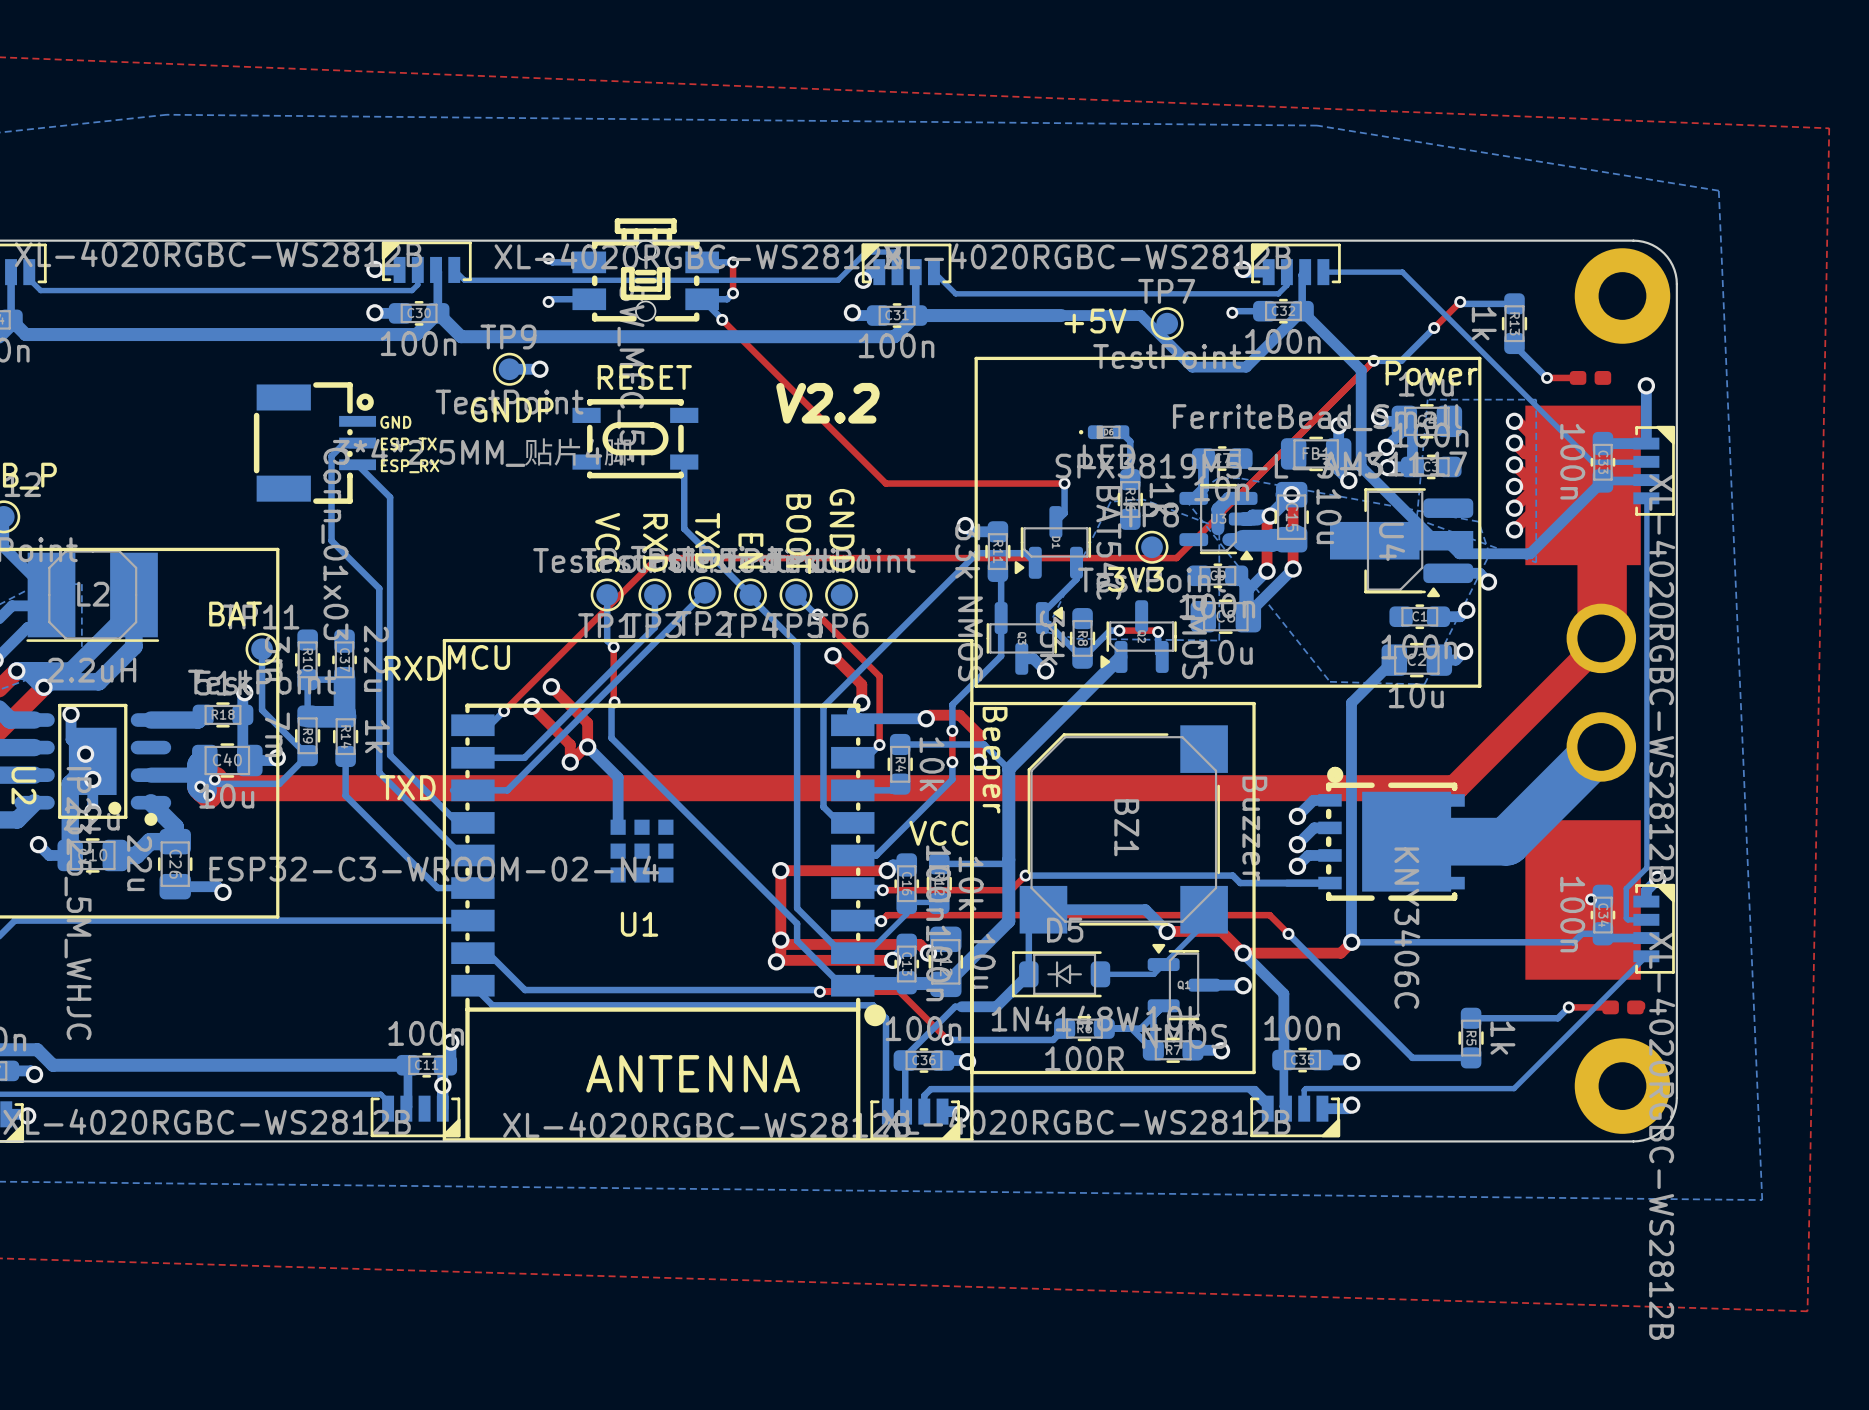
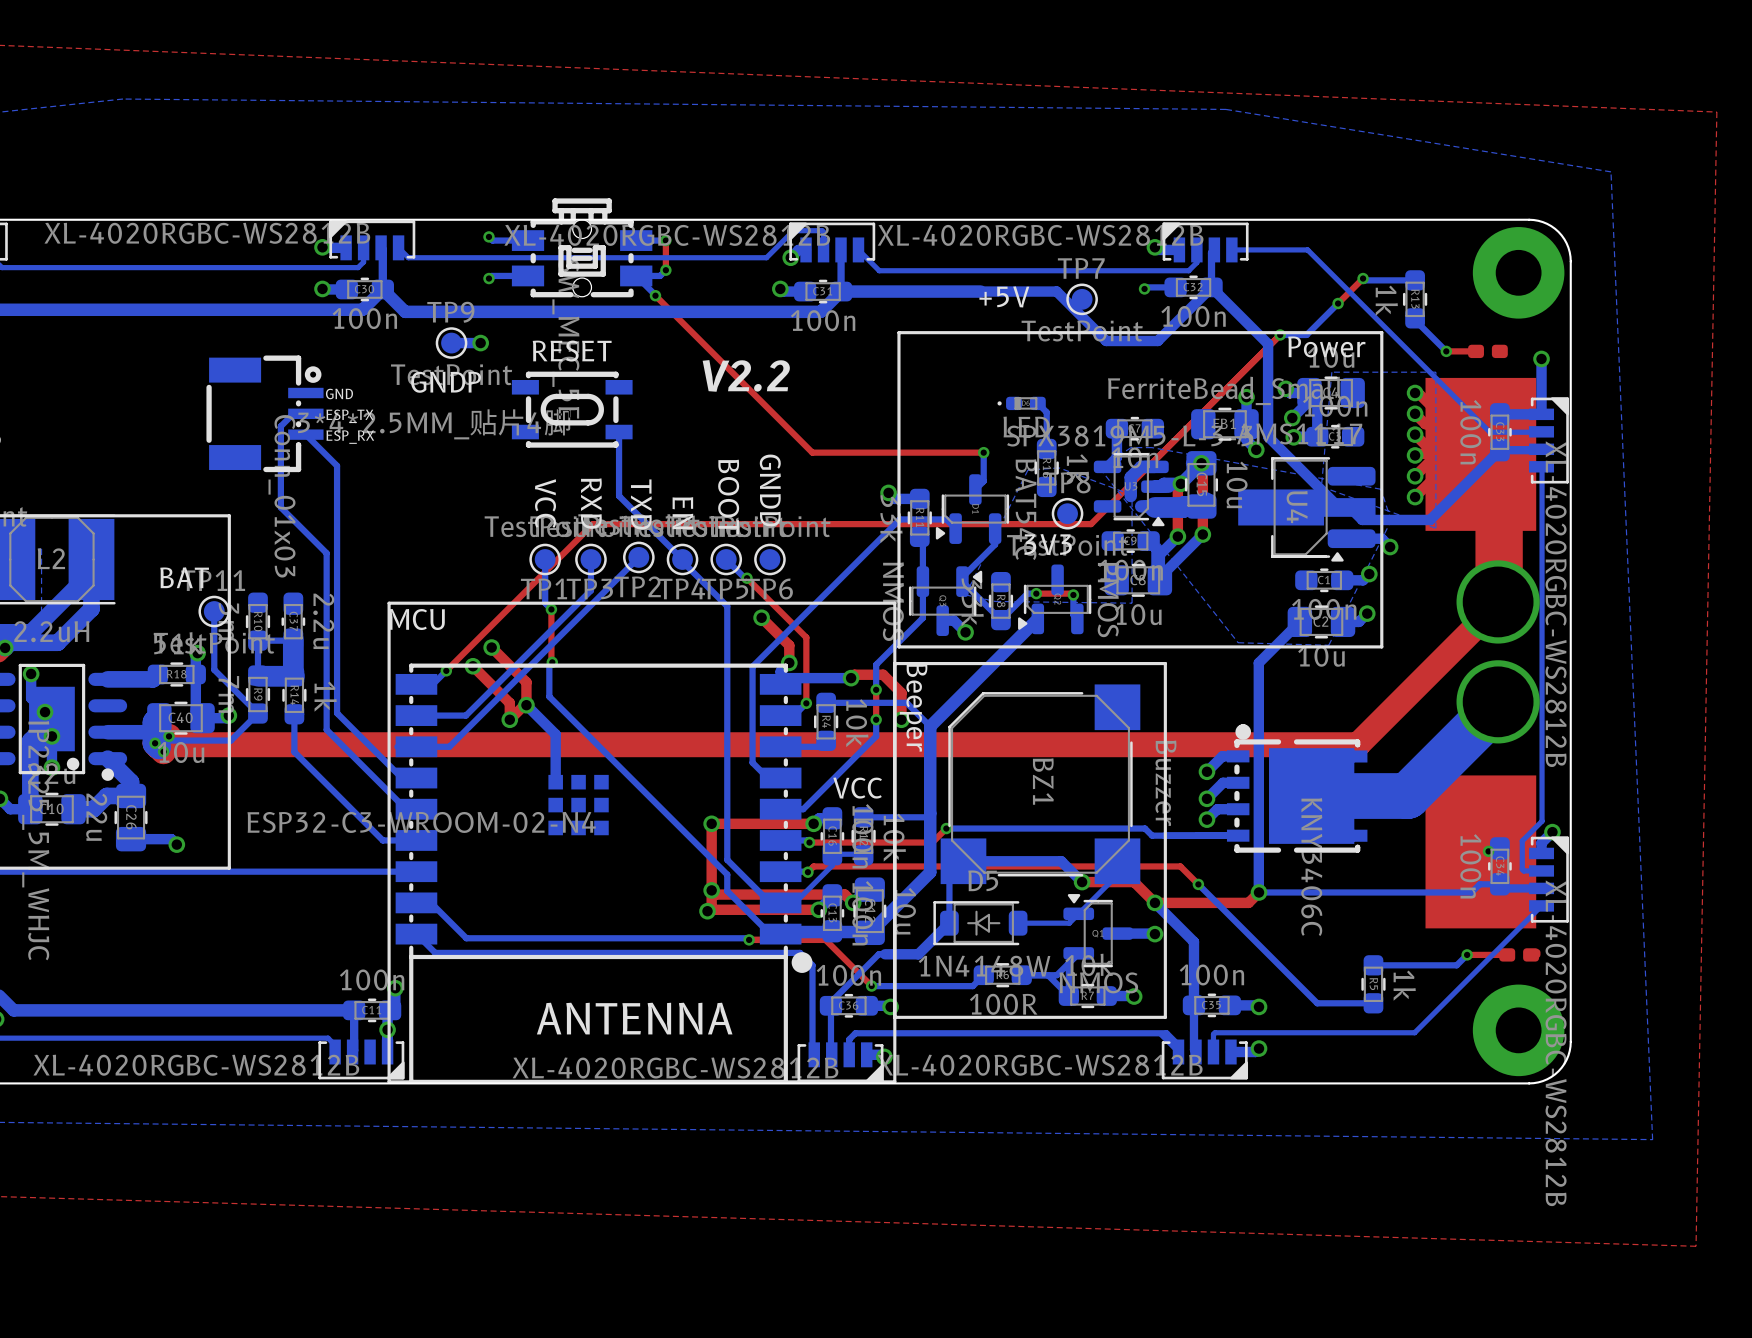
part footprint: [1566, 603, 1637, 782] -> [1456, 560, 1540, 744]
text: RXD (413, 668) -> none
text: TXD (407, 787) -> none
U1 name: U1 (639, 924) -> none

